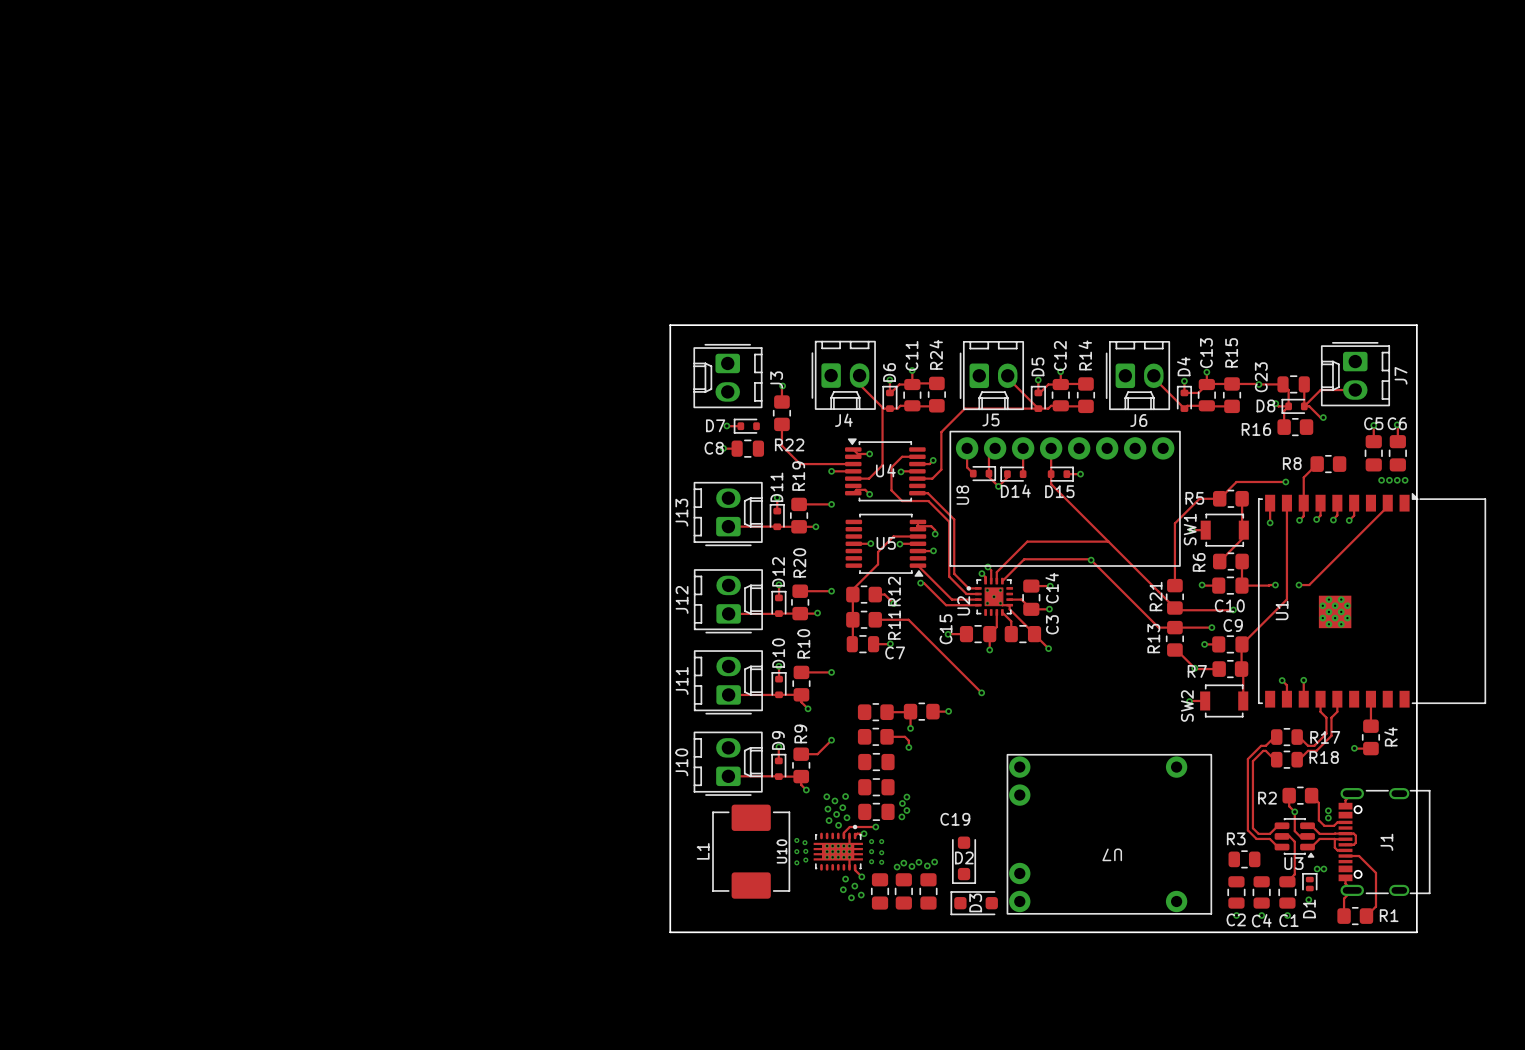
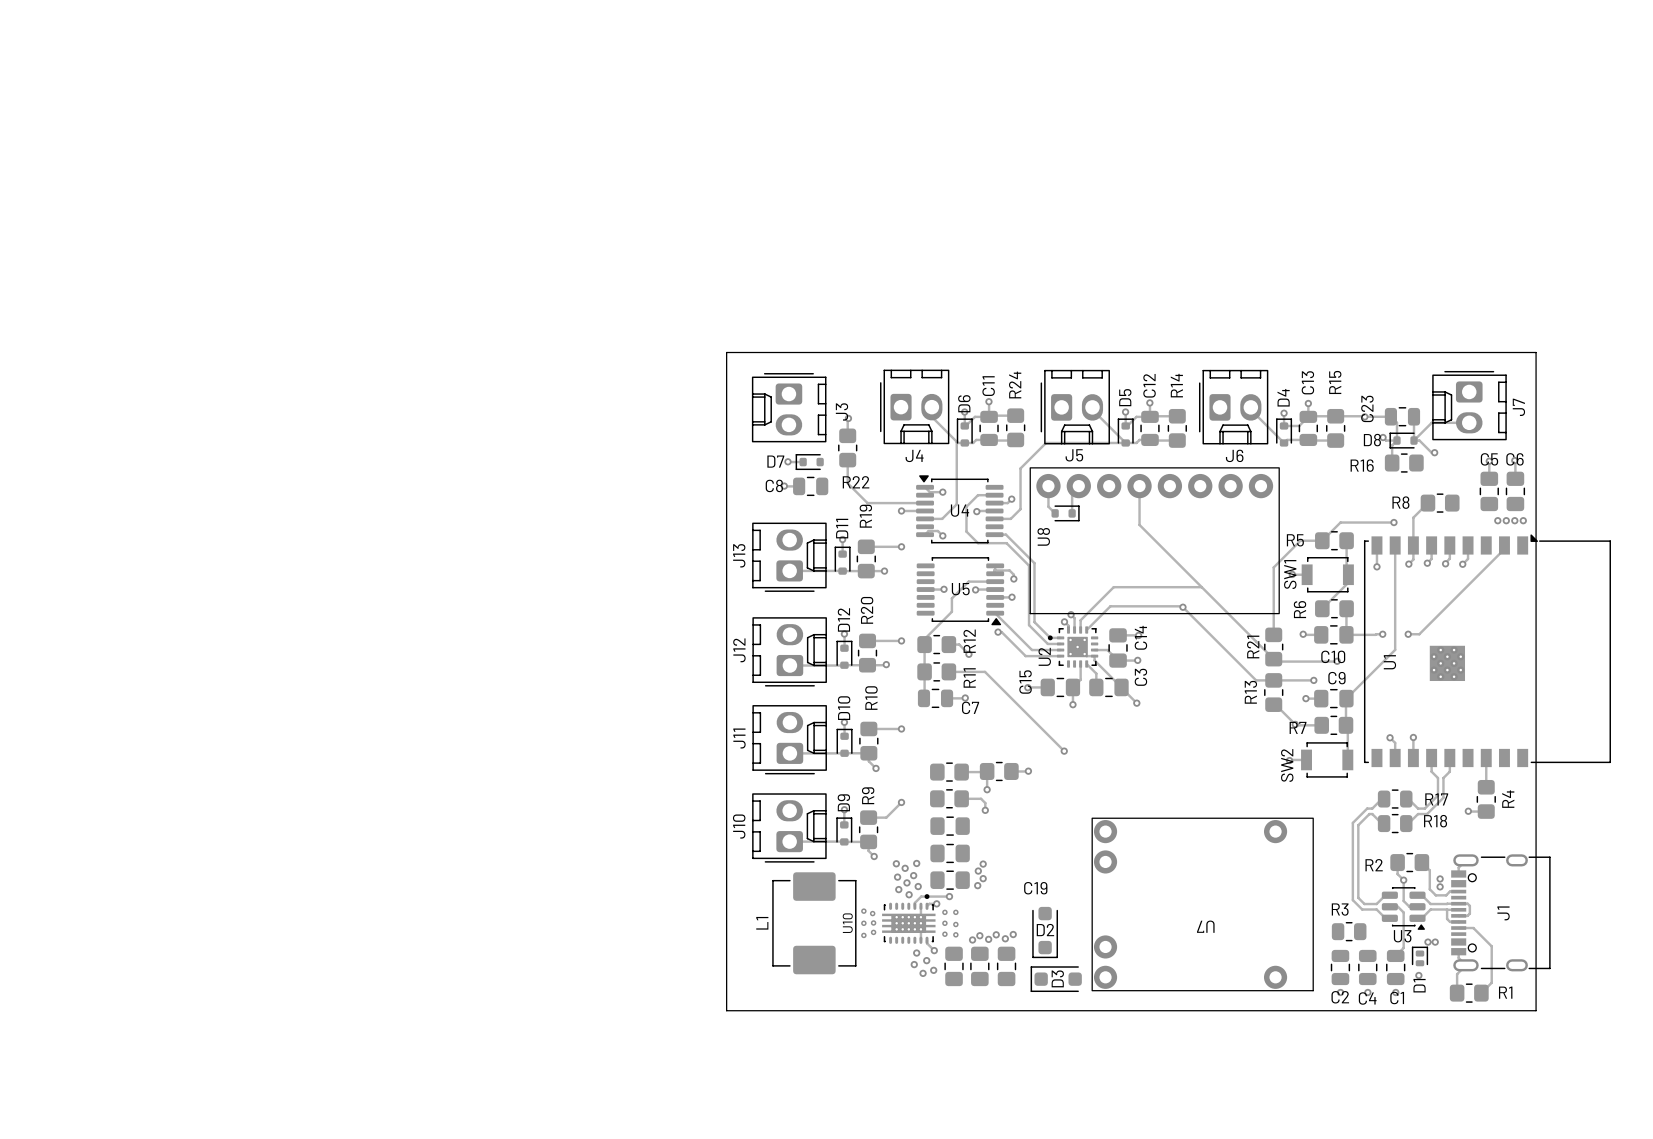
track: (1023, 448) (1023, 474) -> none
track: (988, 473) (988, 476) (998, 486) (1007, 477) (1007, 474) -> none
D14: (1013, 474) -> none
D15: (1060, 474) -> none
track: (1066, 474) (1080, 474) -> none
via: (1080, 474) -> none
via: (998, 486) -> none

